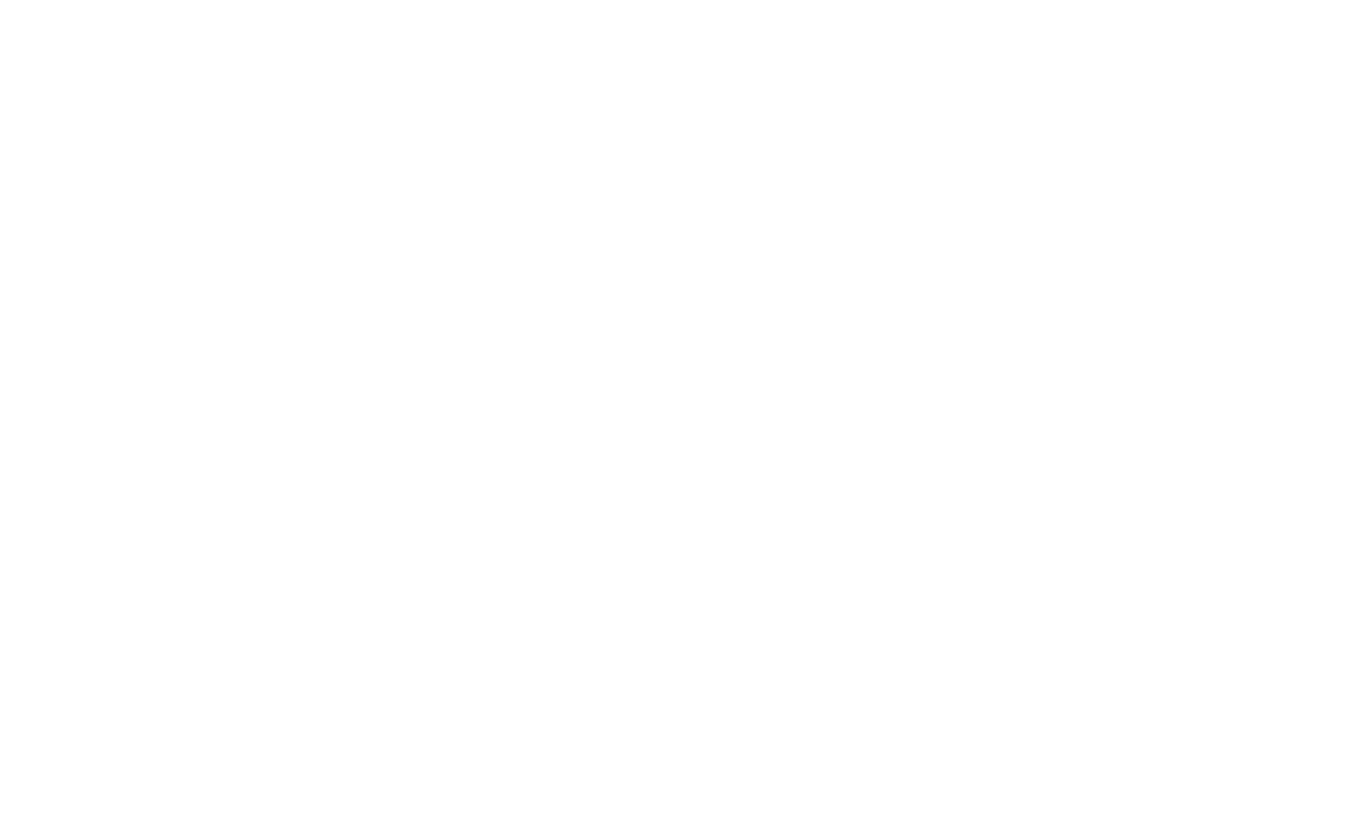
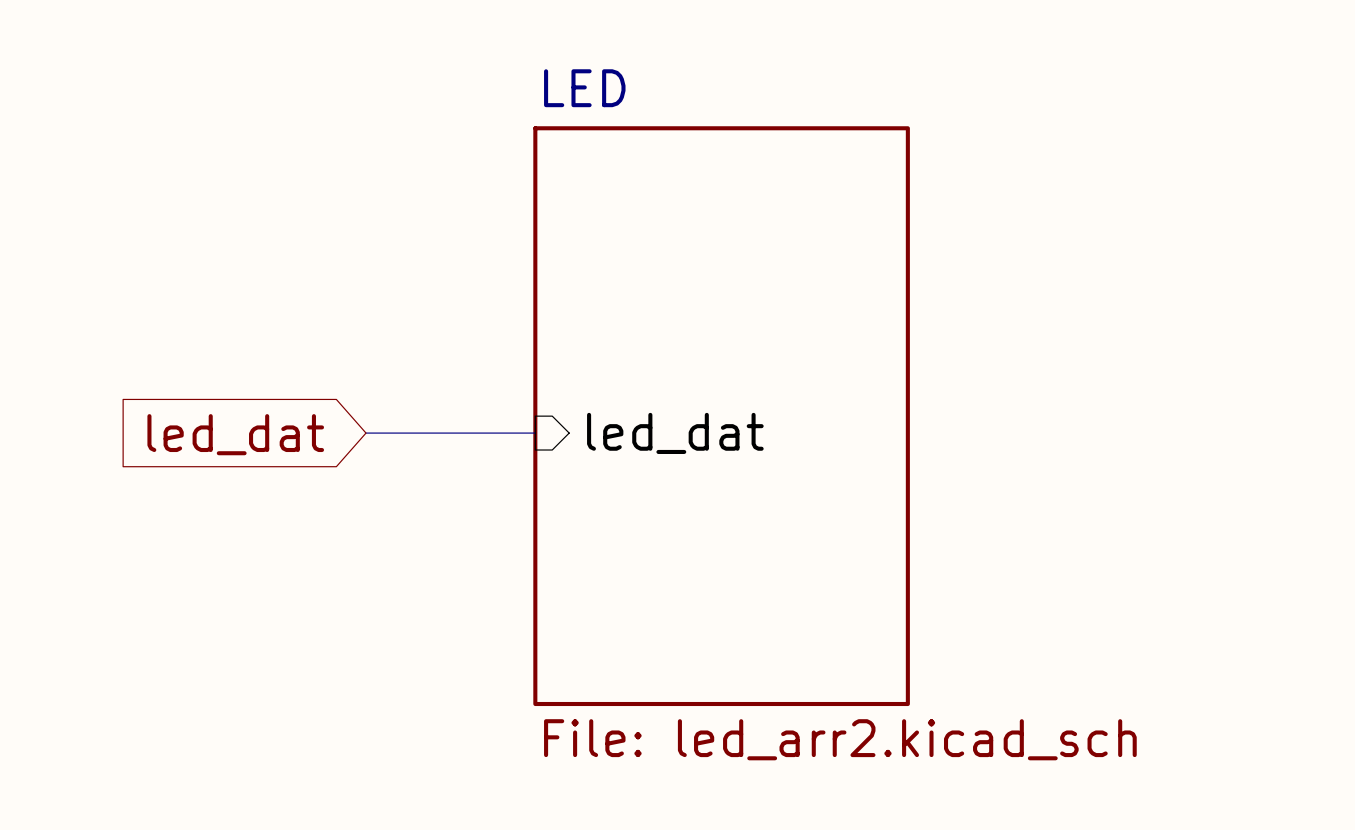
sheet LED: none -> File: led_arr2.kicad_sch (721, 416)
wire: none -> (366, 433) (535, 433)
sheet pin: none -> led_dat (675, 433)
global label: none -> led_dat (235, 434)

